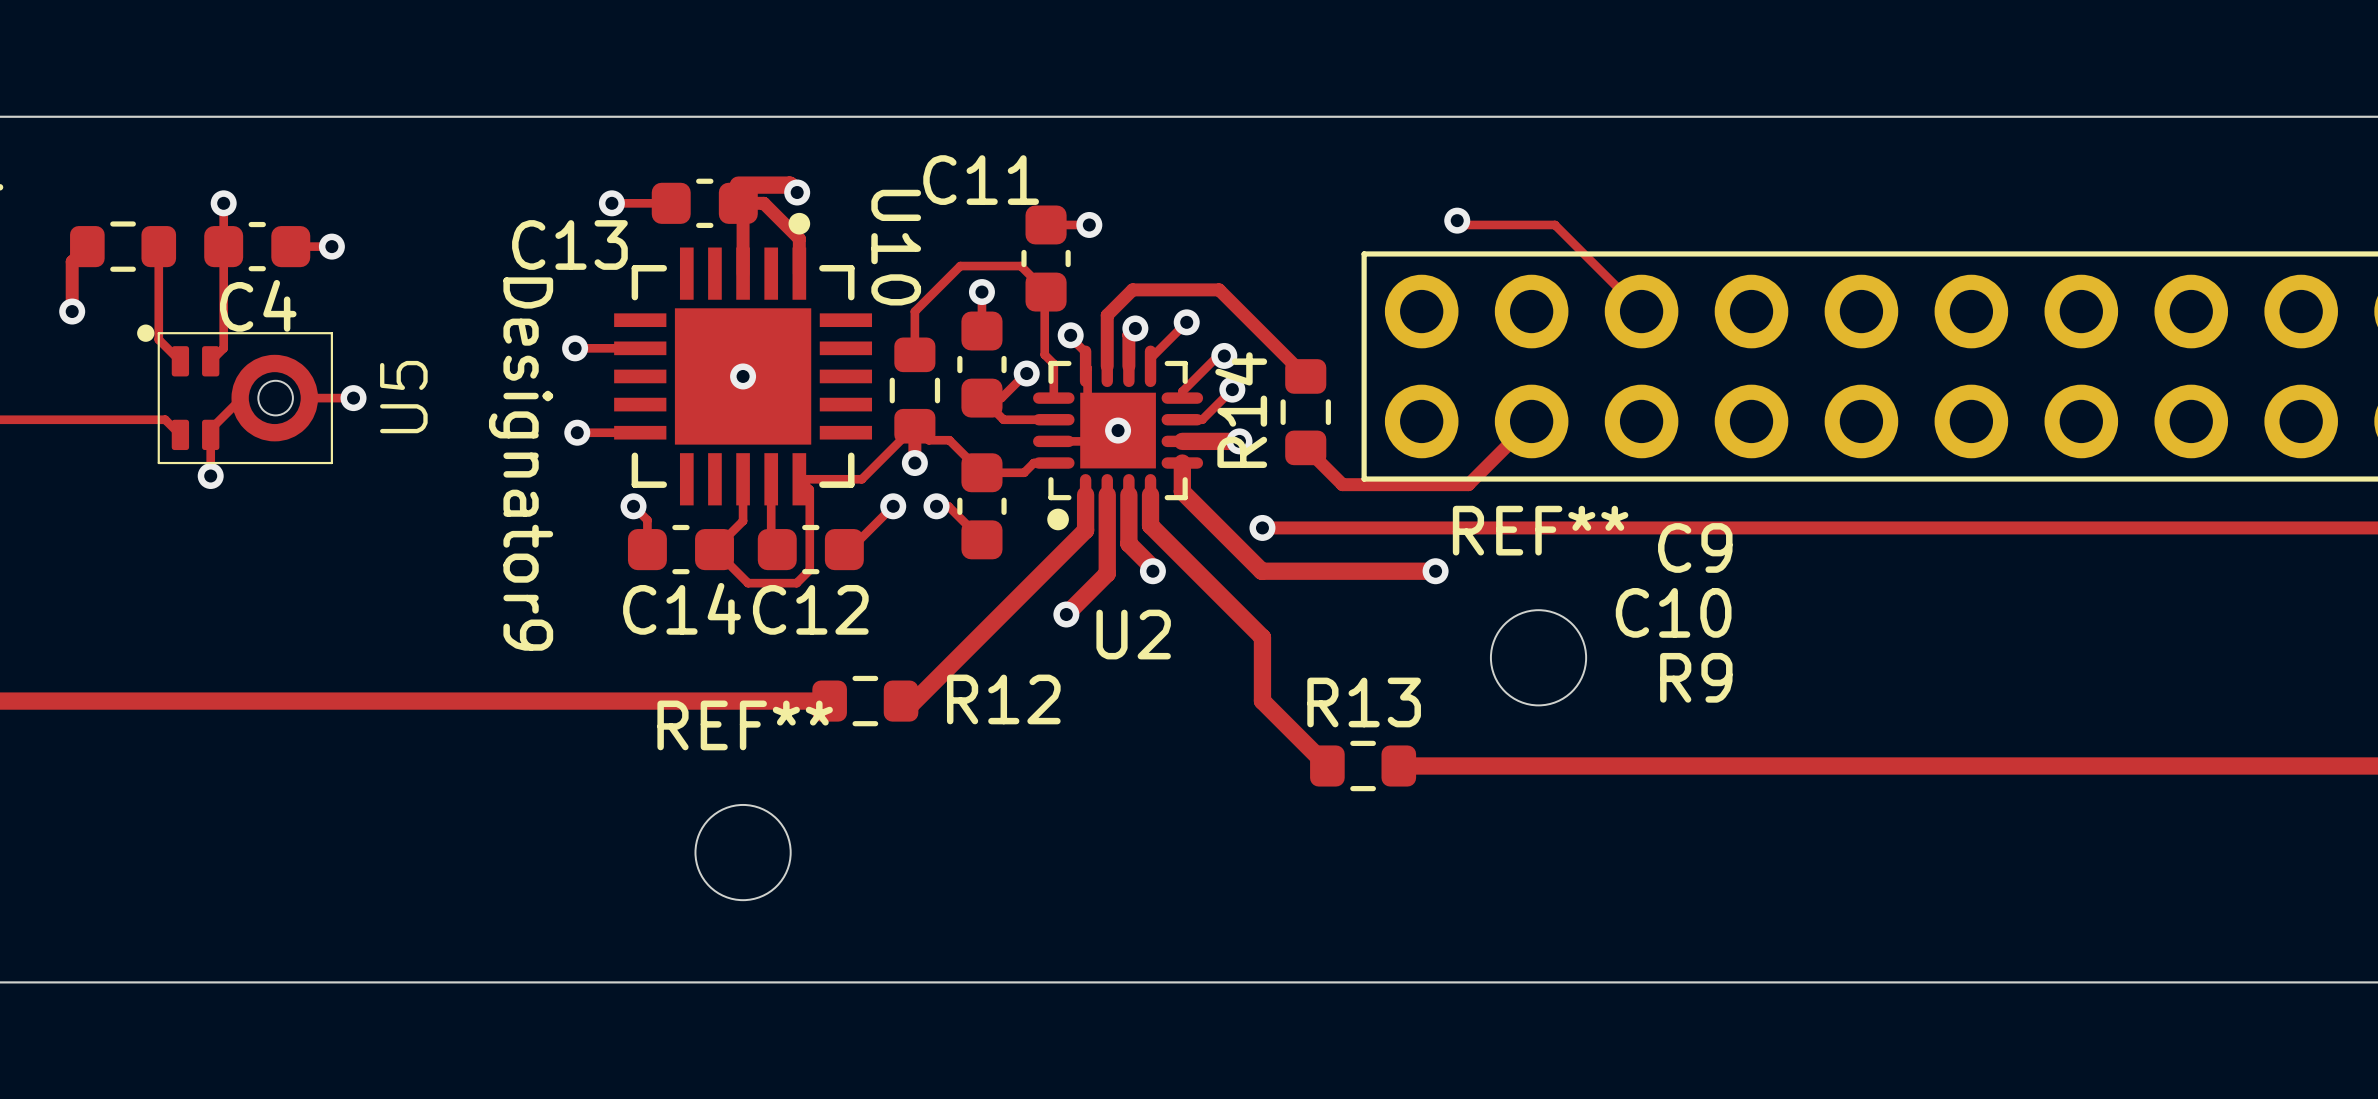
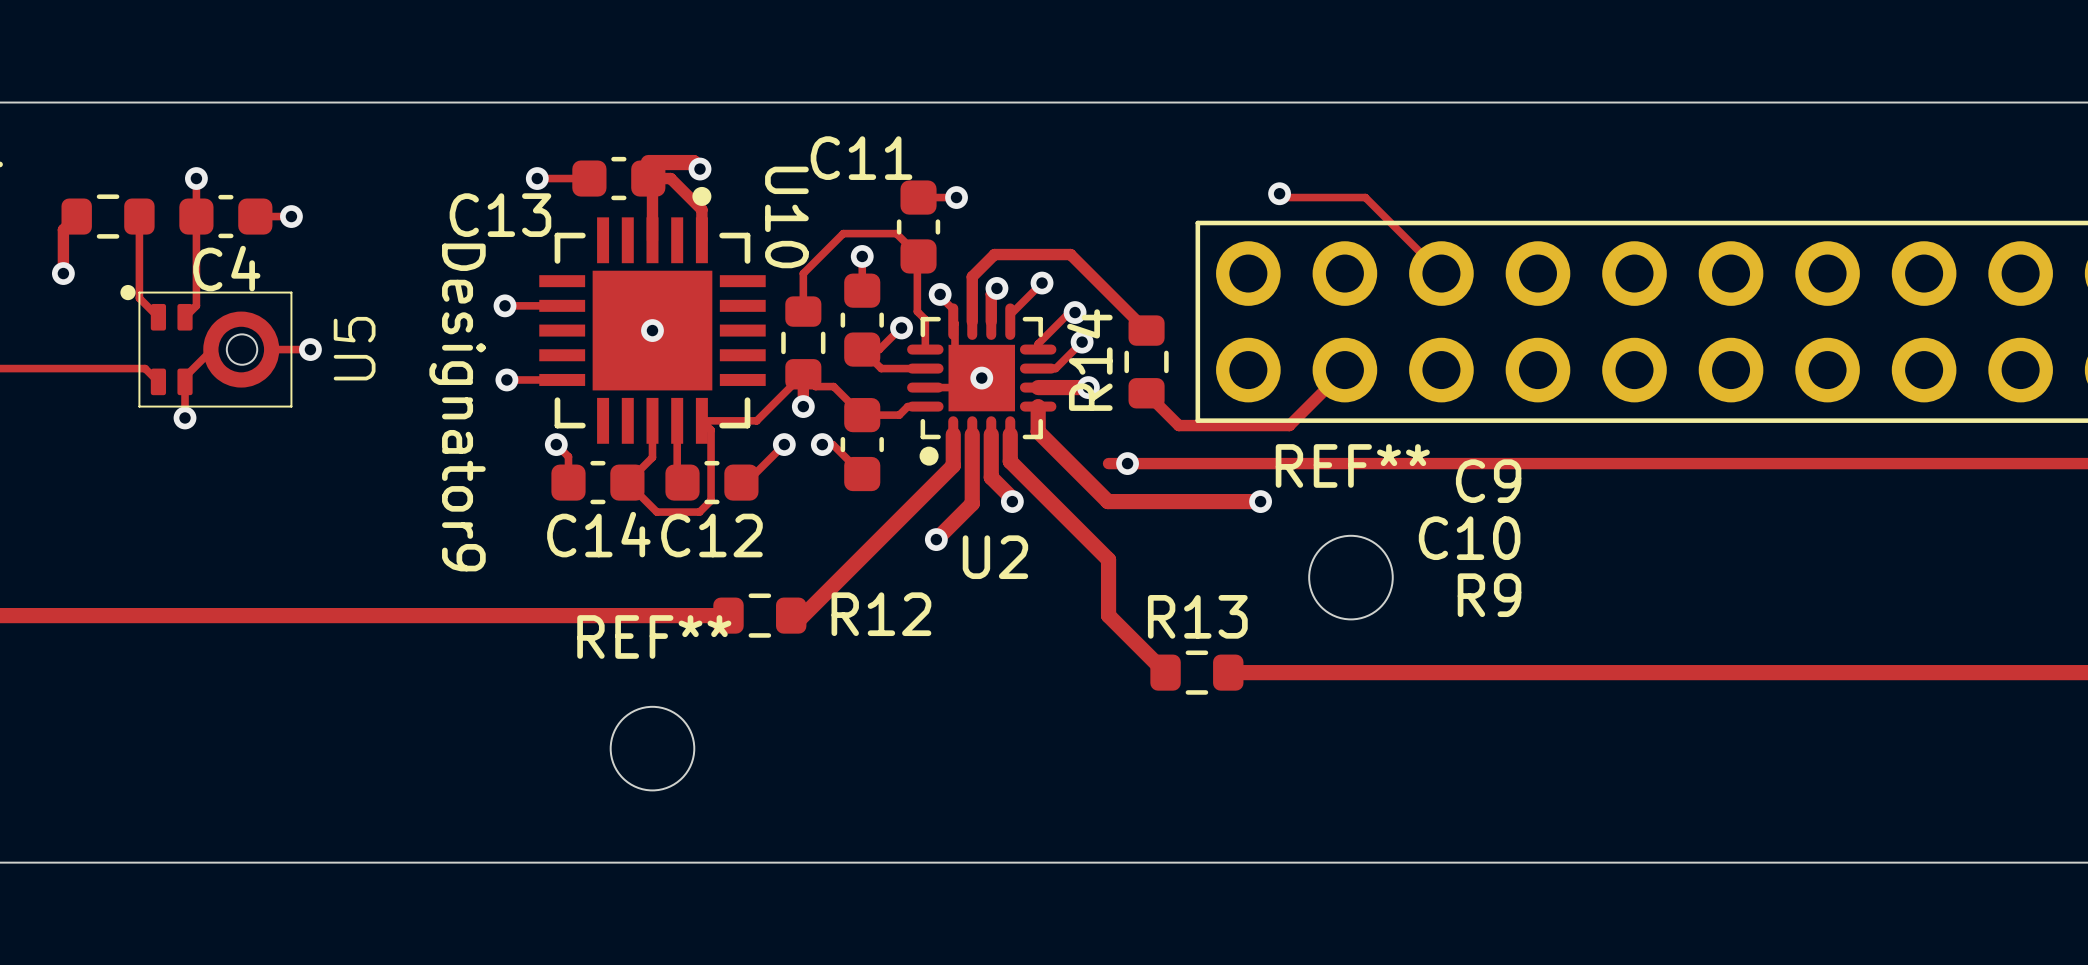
via position: (1262, 527) -> (1127, 463)

